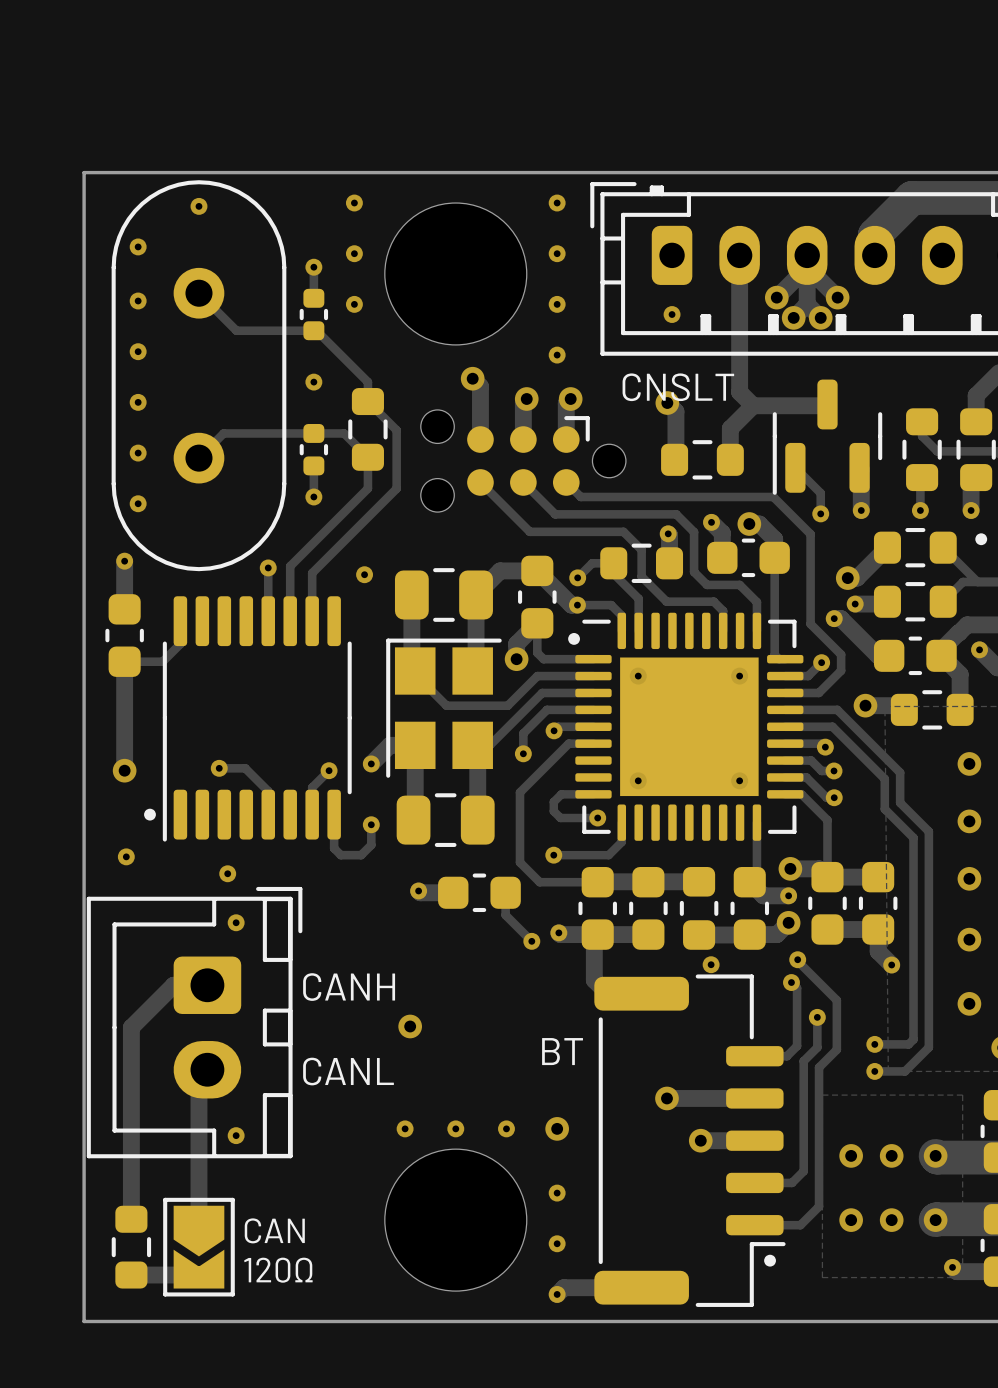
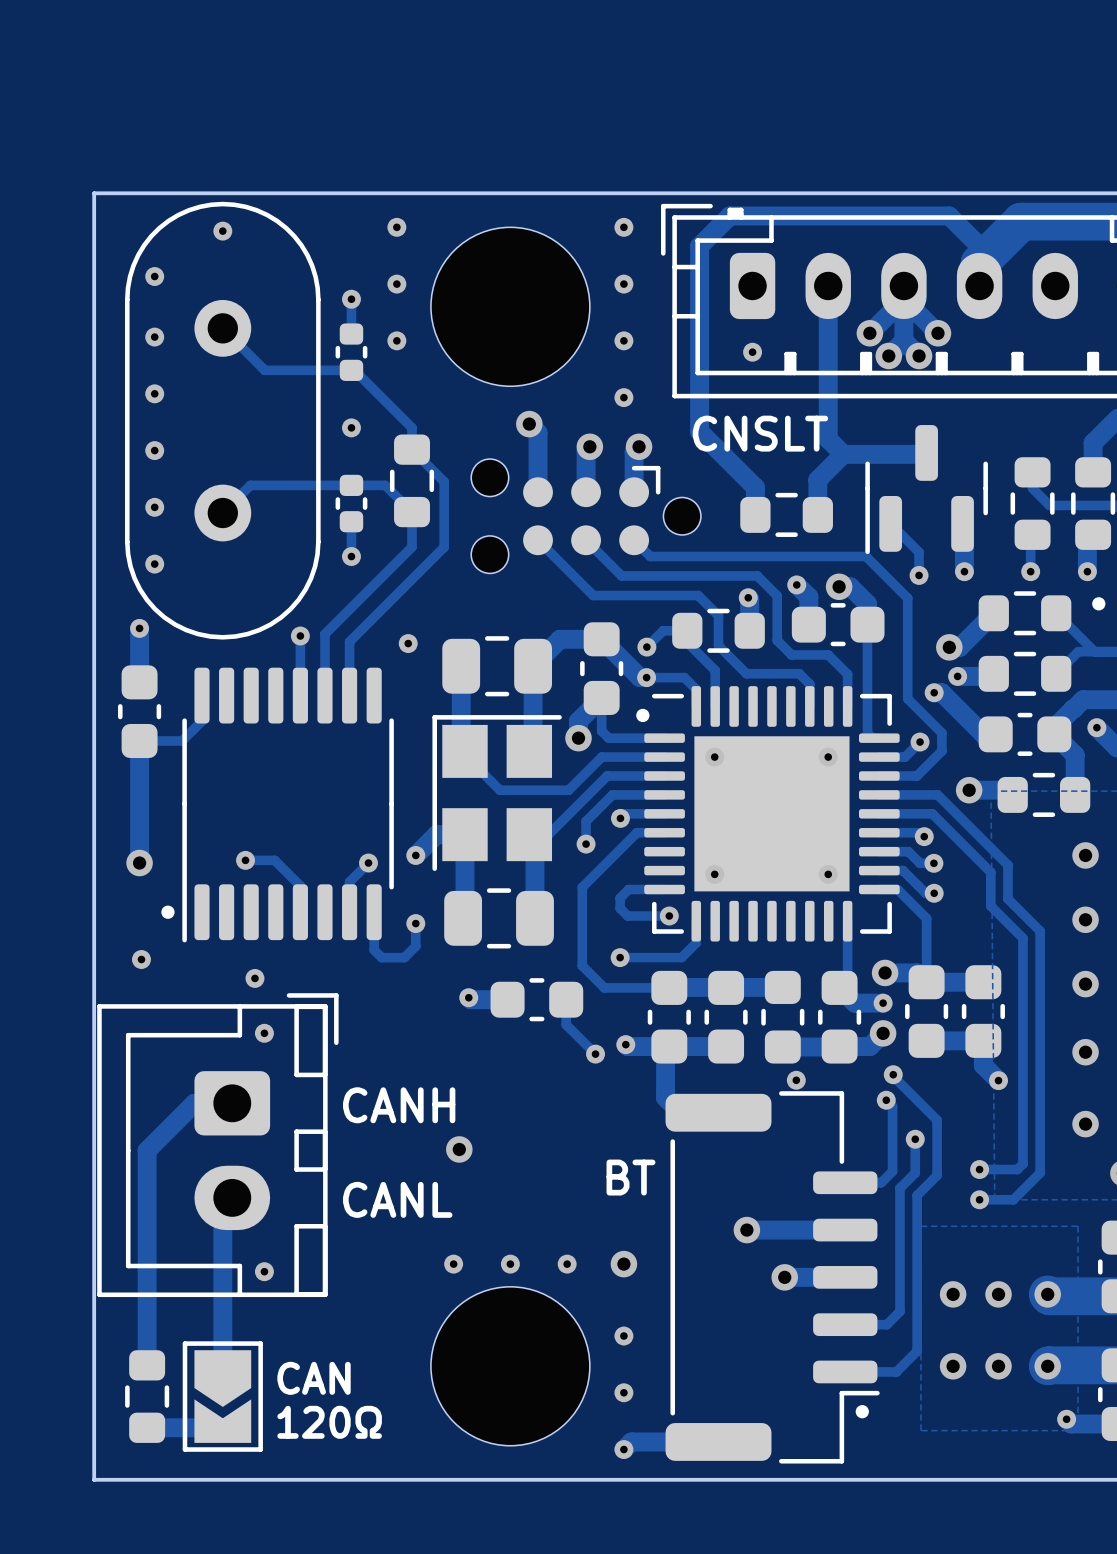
track: (667, 403) (675, 411) (674, 459) -> (979, 285) (979, 246) (949, 215) (729, 215) (699, 246) (699, 431) (755, 487) (755, 514)
via: (667, 403) -> none

